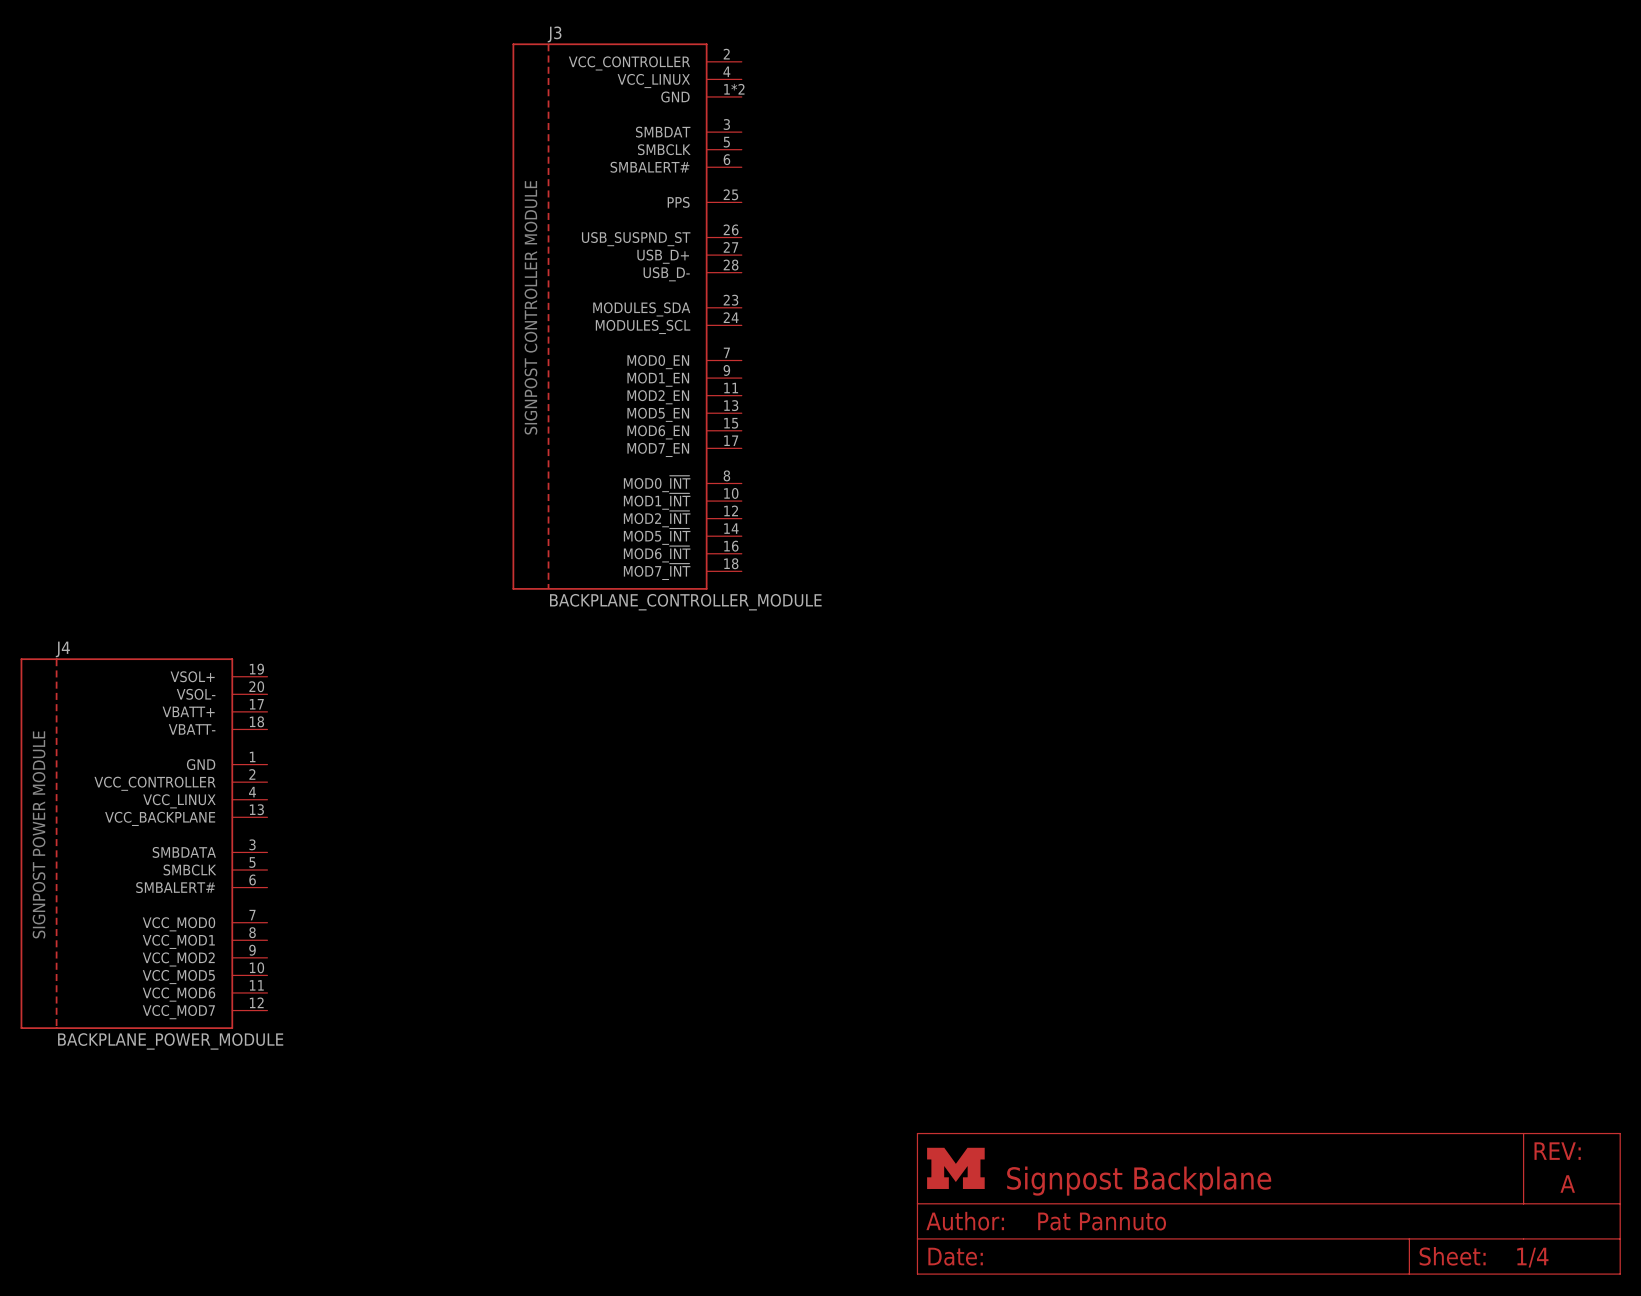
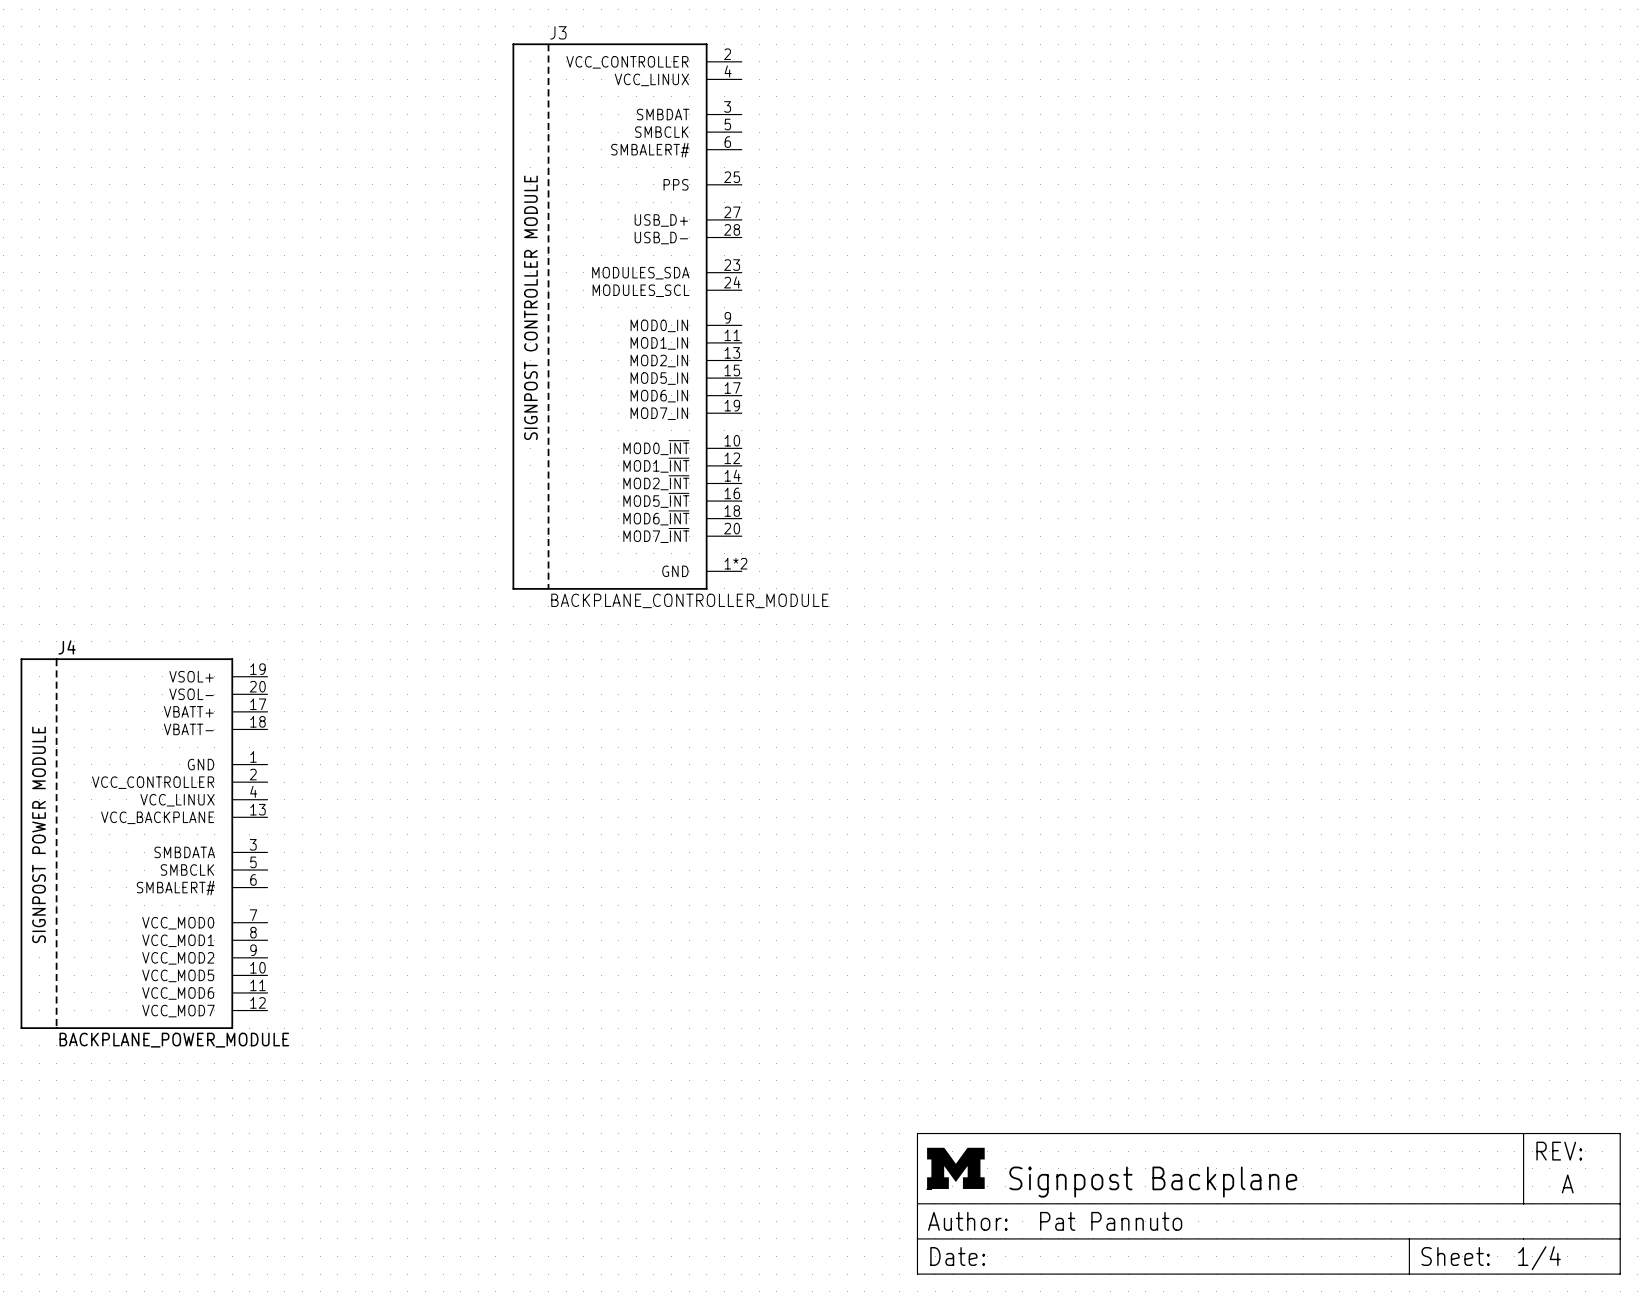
J3 symbol: [512, 43, 742, 590] -> [512, 43, 742, 590]

